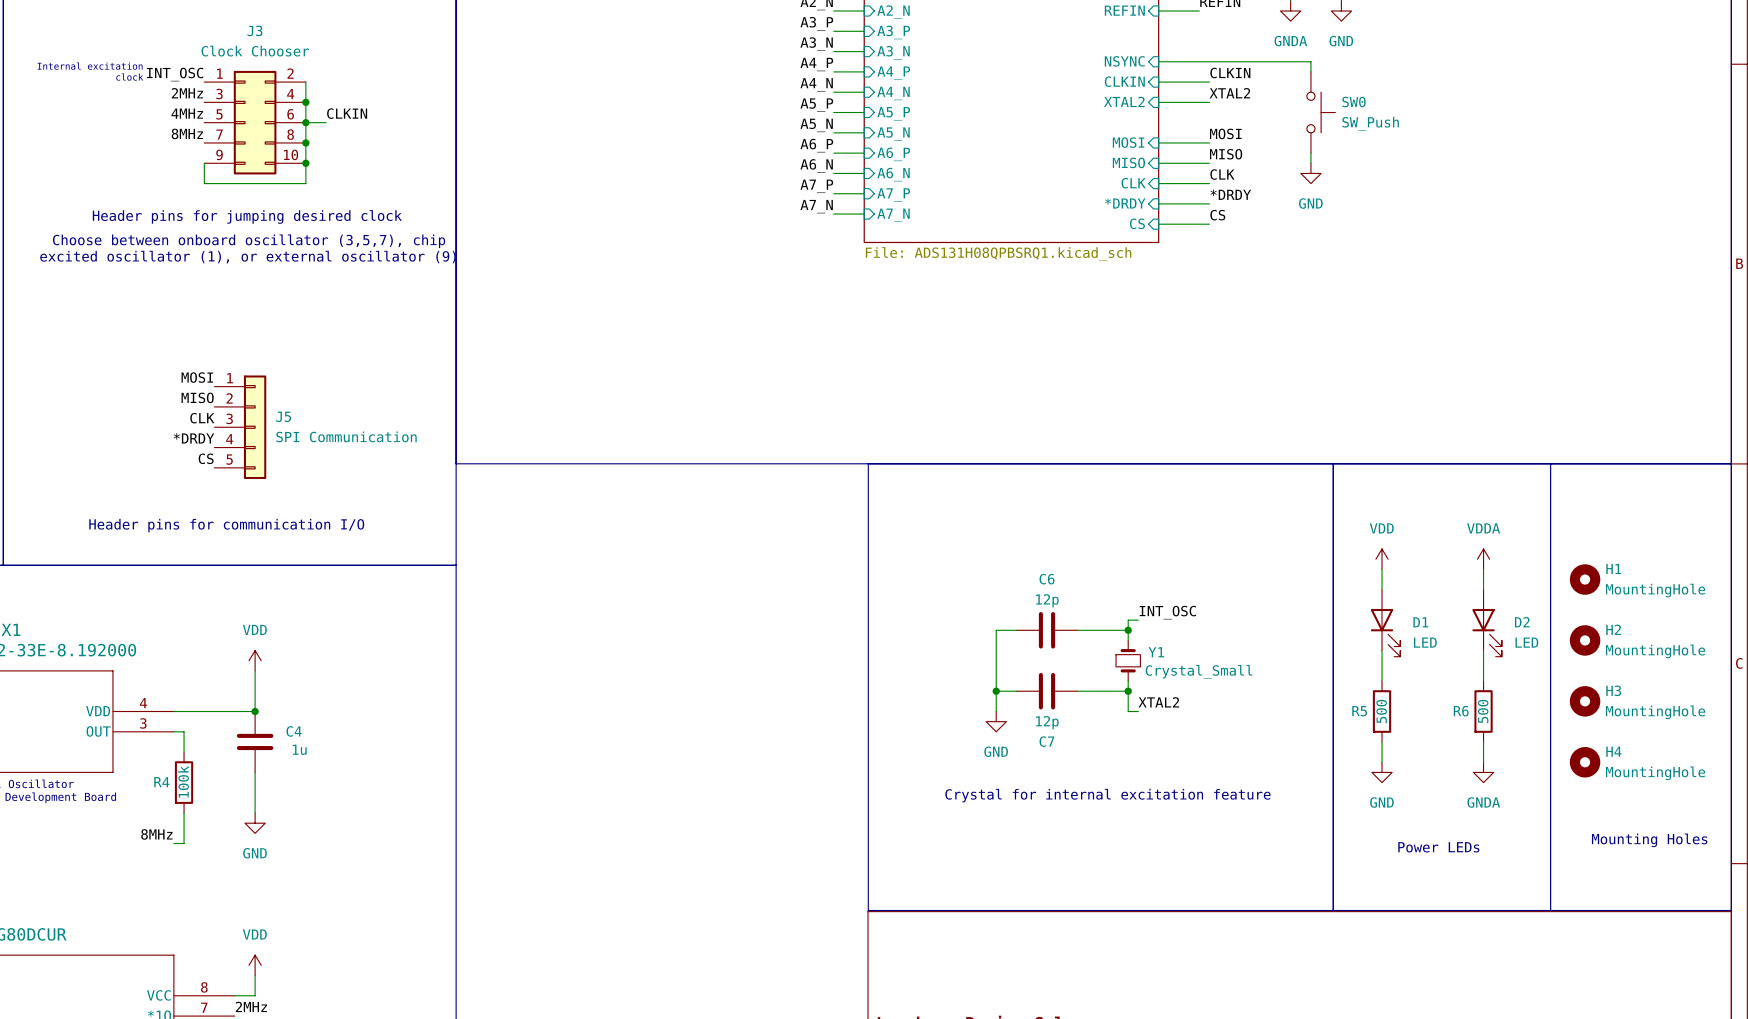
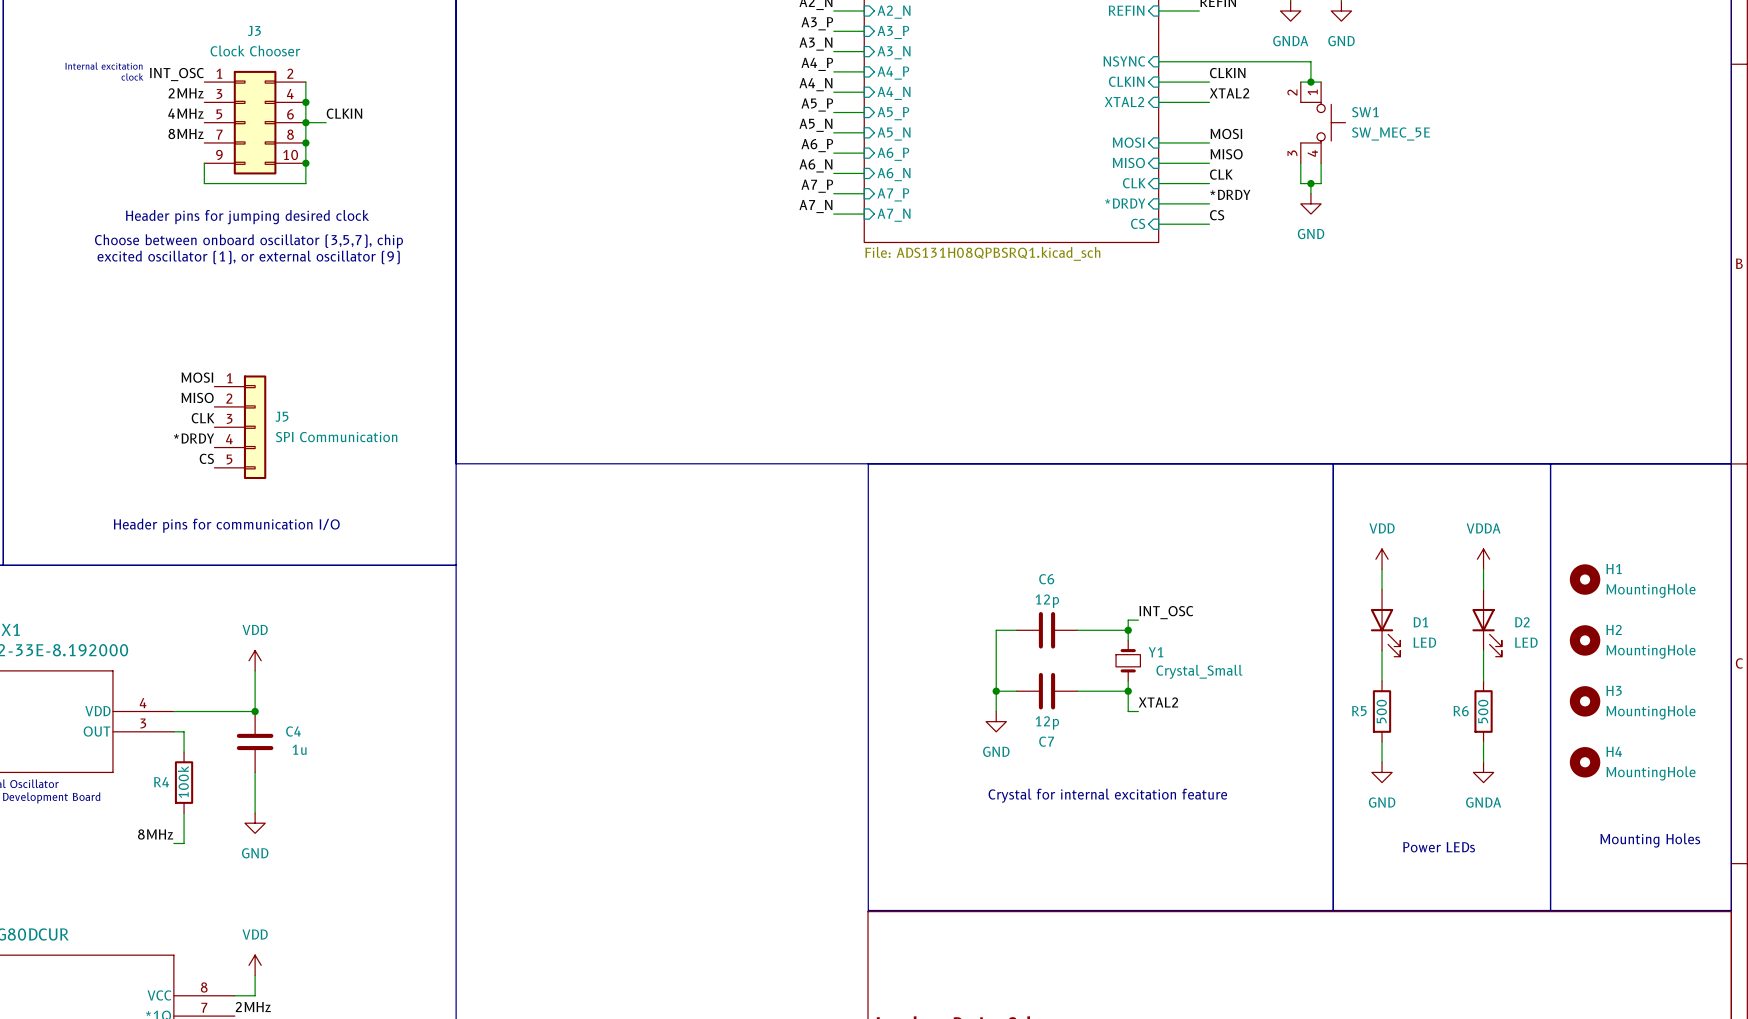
wire: none -> (1300, 82) (1321, 82)
junction: none -> (1310, 82)
SW0: SW_Push (1321, 112) -> none
SW1: none -> SW_MEC_5E (1323, 122)
wire: (1310, 153) (1310, 163) -> (1310, 183) (1310, 193)
wire: none -> (1300, 163) (1300, 183) (1321, 183) (1321, 163)
power symbol position: GND (1310, 173) -> GND (1310, 203)
junction: none -> (1310, 183)

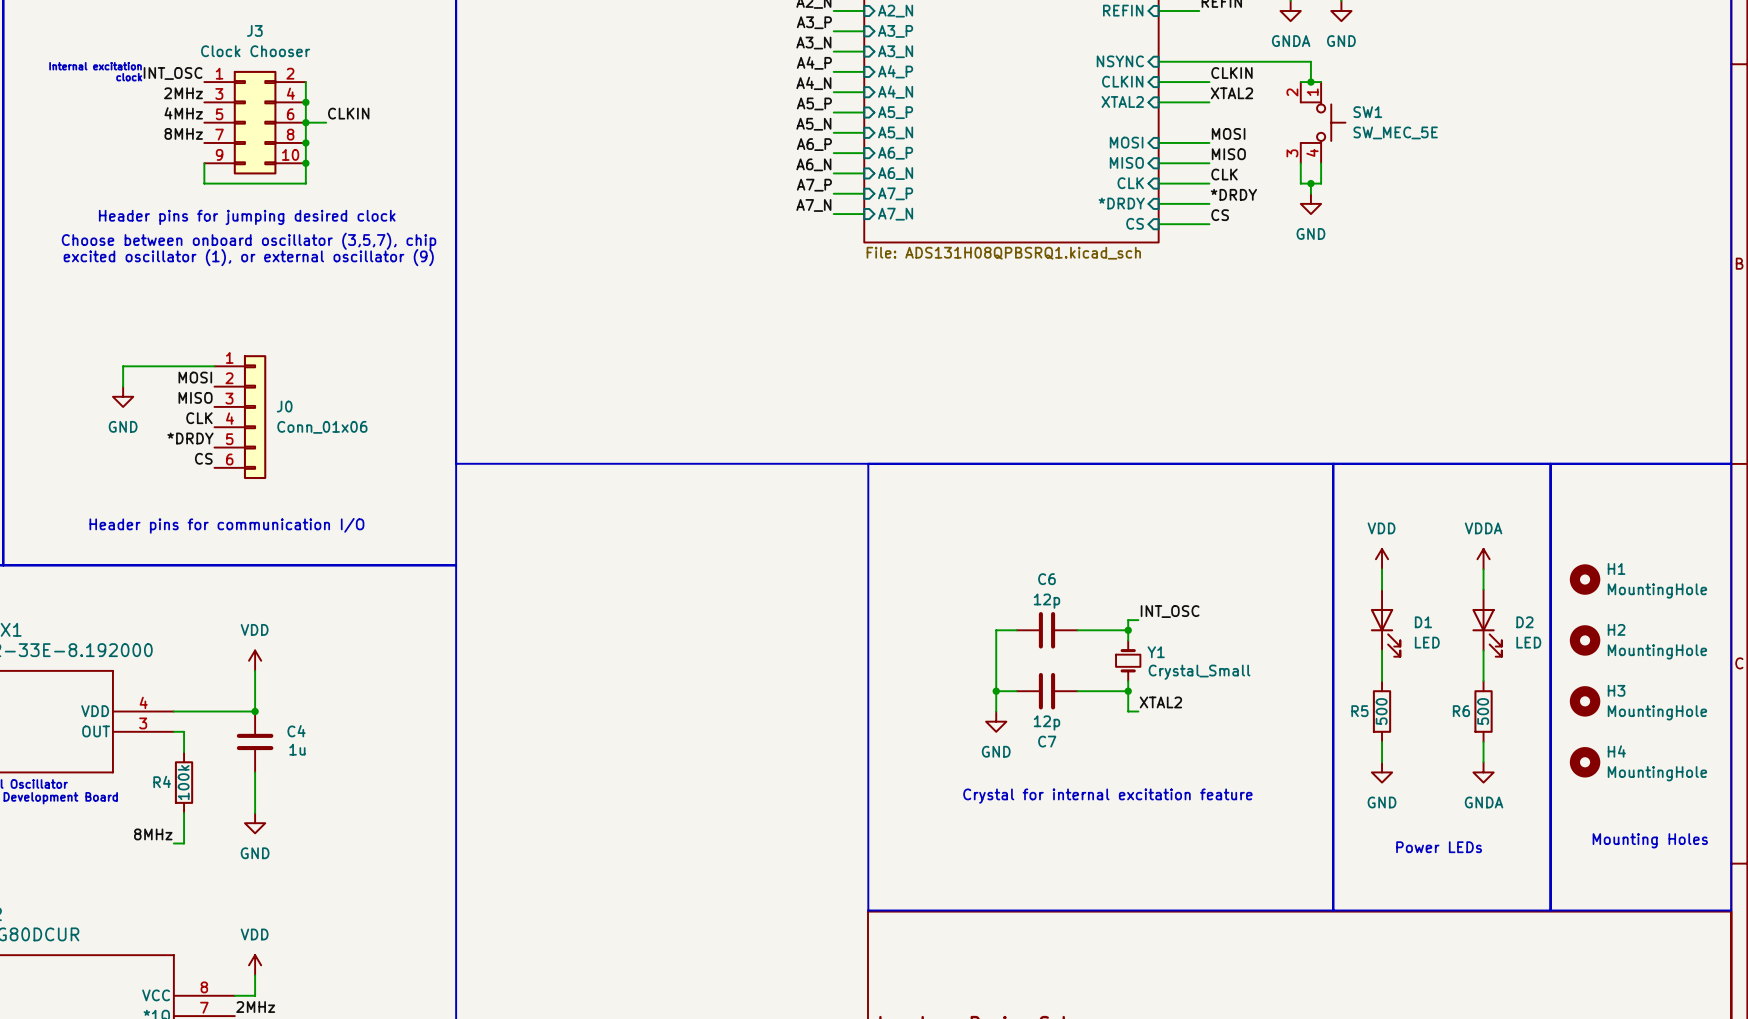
wire: none -> (214, 366) (123, 366) (123, 386)
power symbol: none -> GND (123, 396)
J0: none -> Conn_01x06 (240, 417)
J5: SPI Communication (240, 427) -> none

